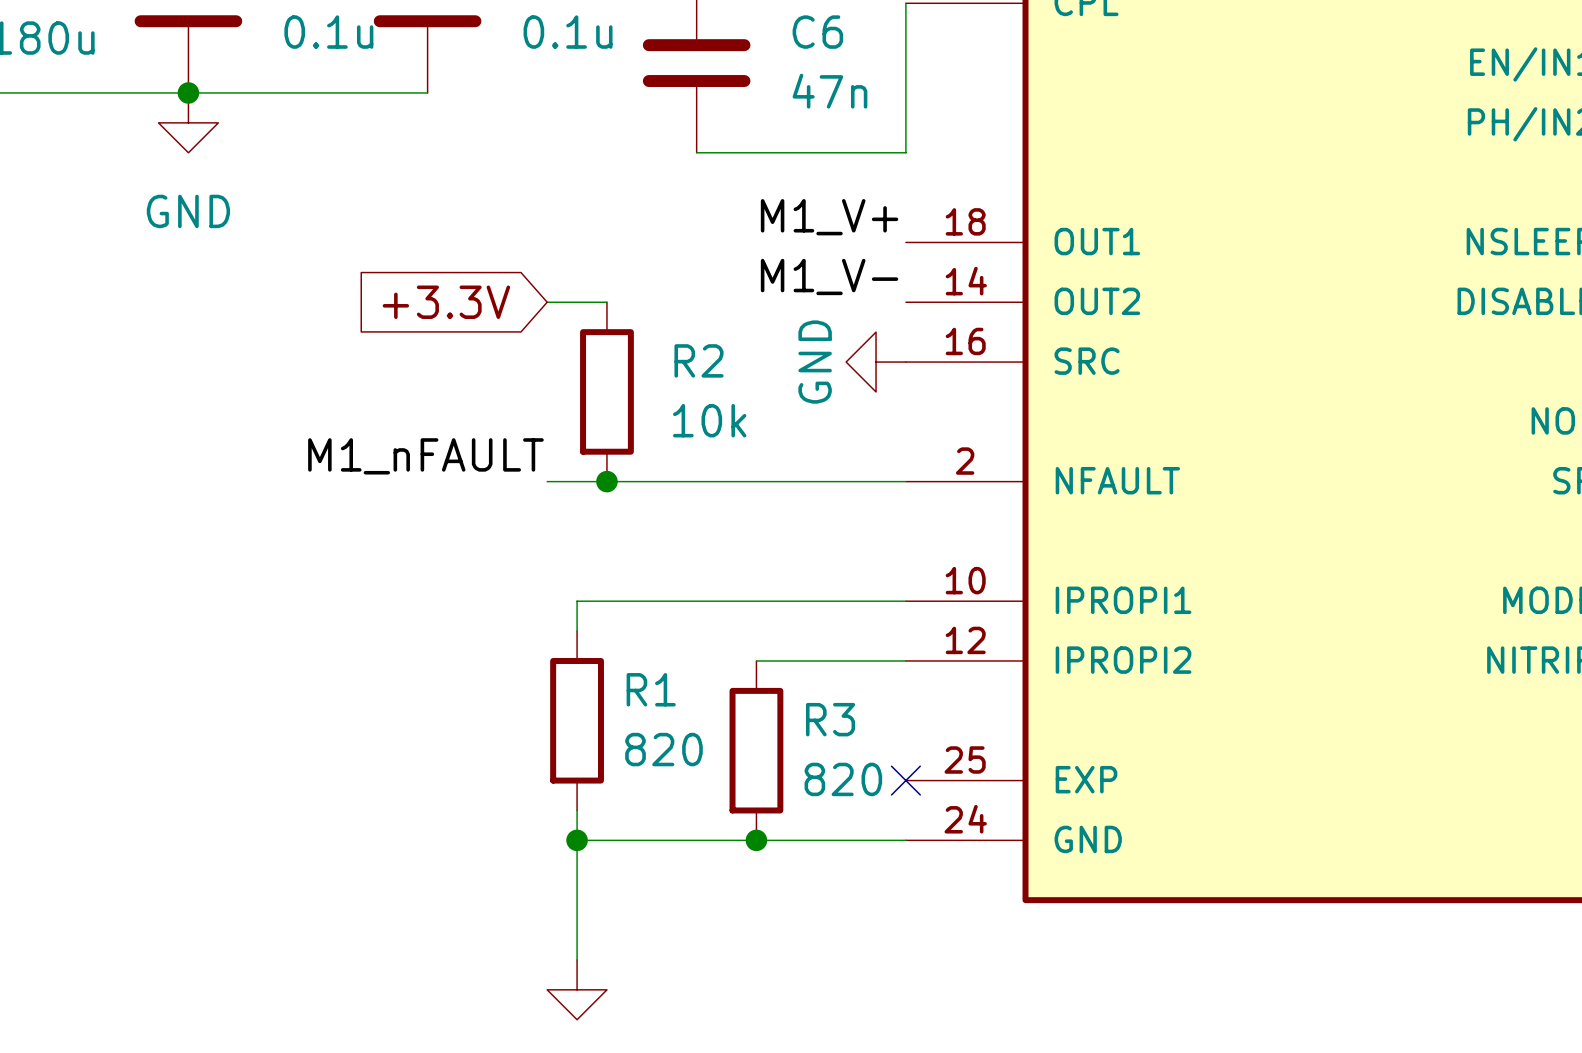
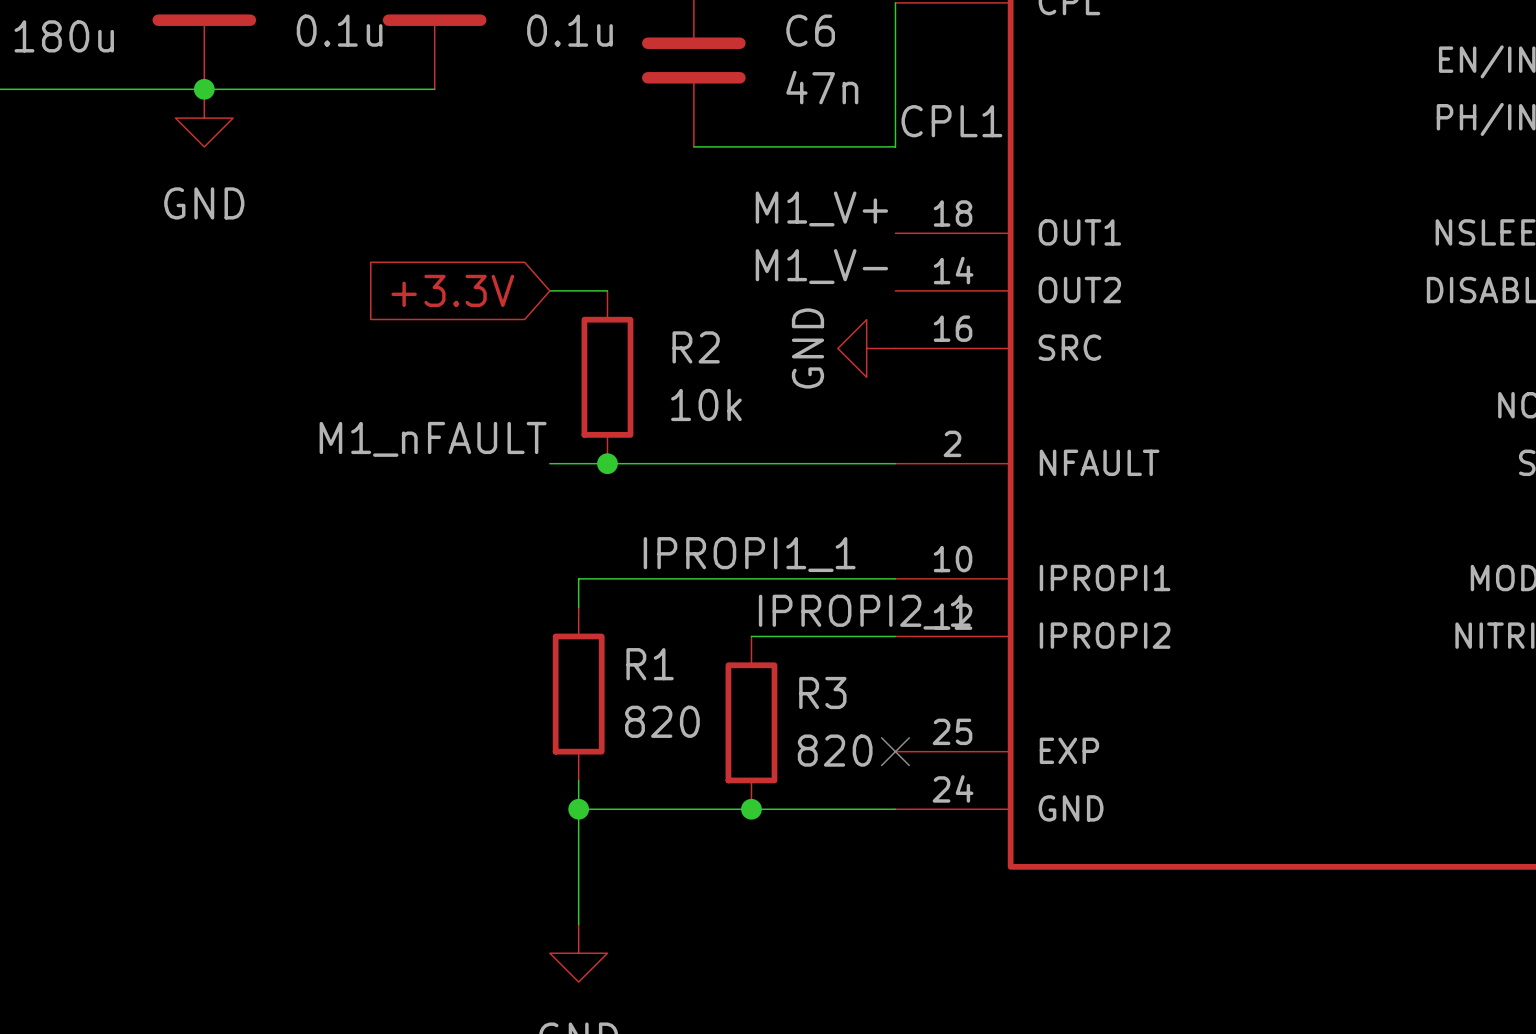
label: none -> CPL1 (951, 121)
label: none -> IPROPI1_1 (749, 554)
label: none -> IPROPI2_1 (864, 612)

